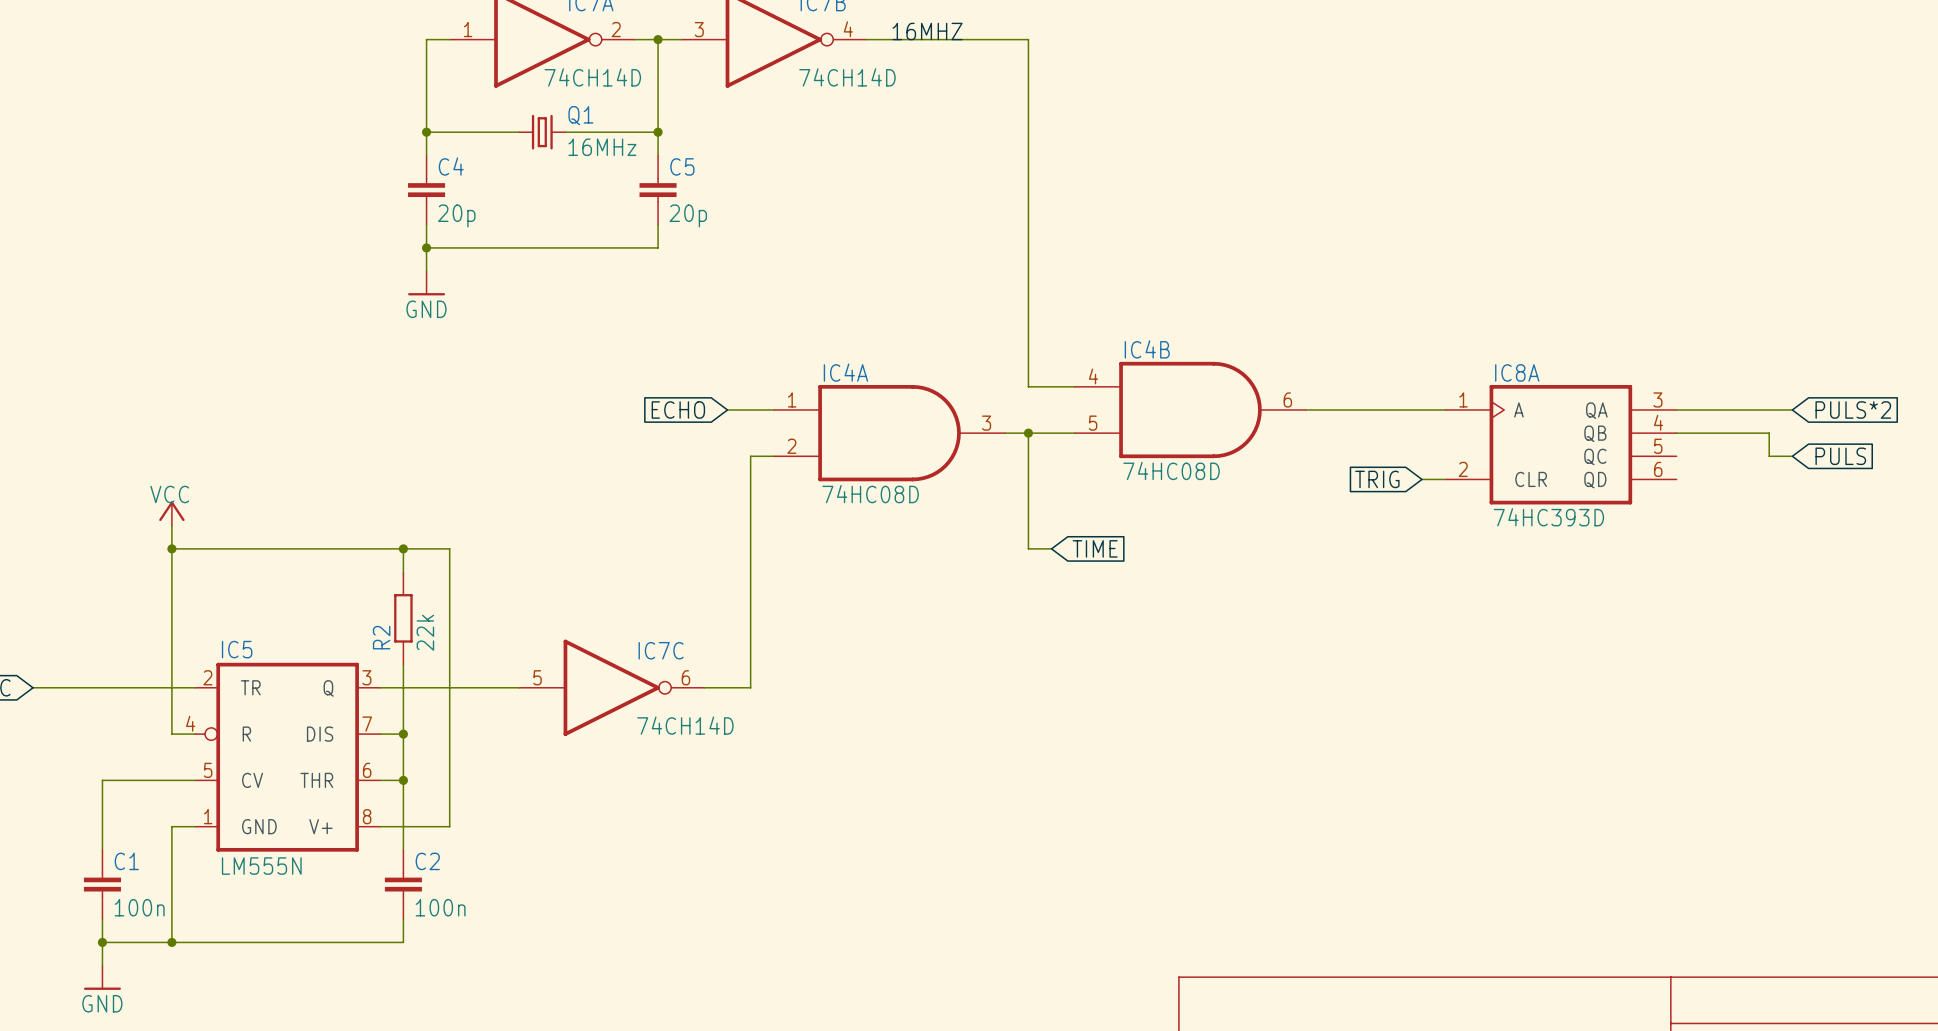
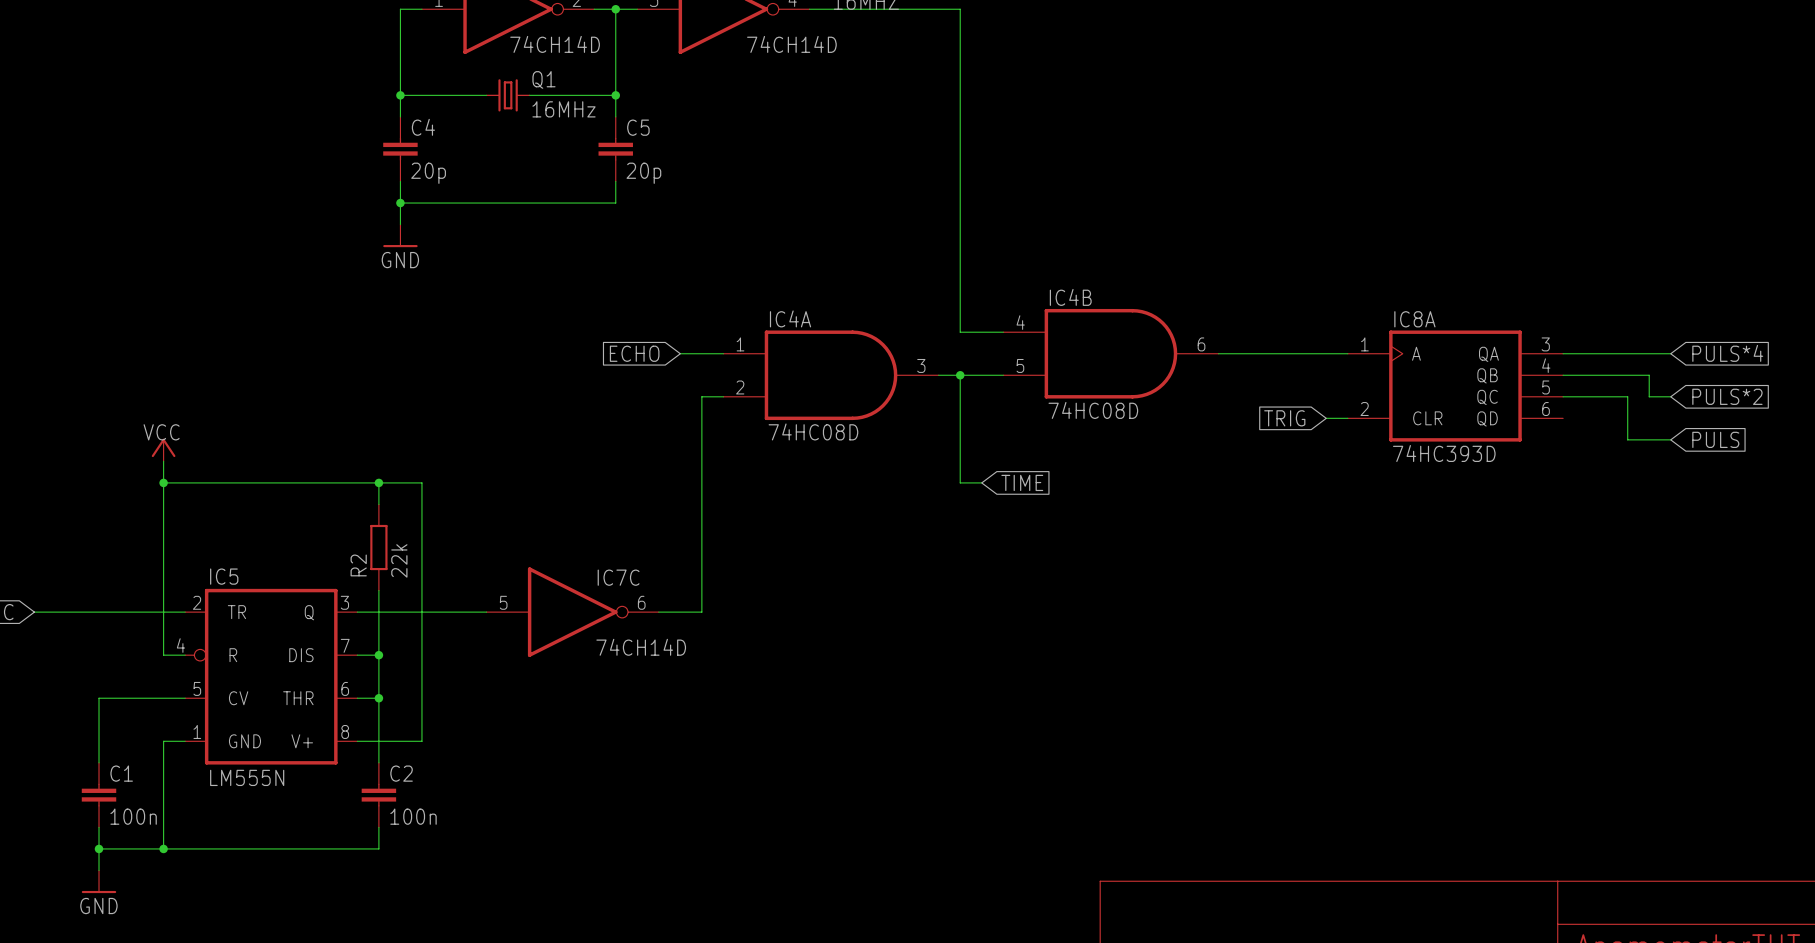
global label: PULS*2 (1853, 409) -> PULS*4 (1727, 353)
wire: none -> (1563, 396) (1627, 396) (1627, 439) (1670, 439)
global label: PULS (1840, 456) -> PULS*2 (1727, 396)
global label: none -> PULS (1715, 439)

